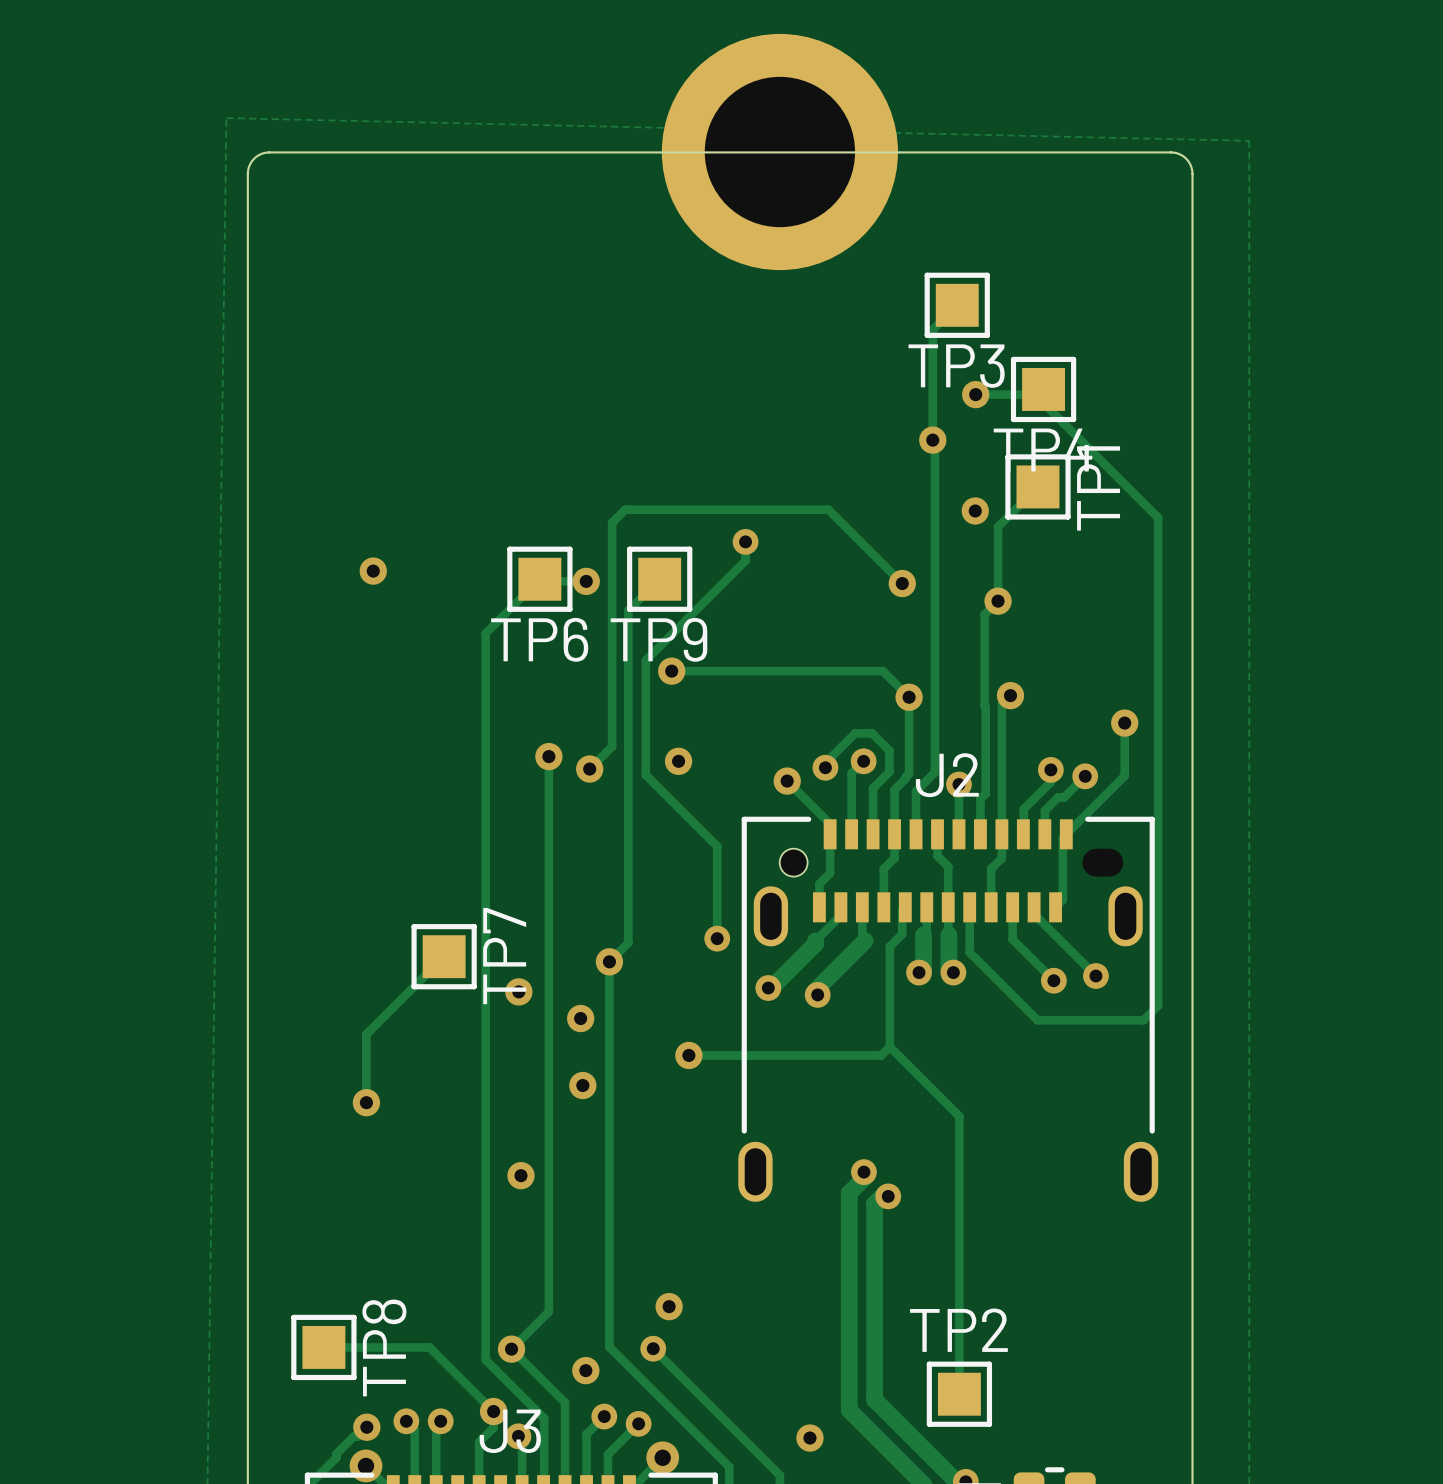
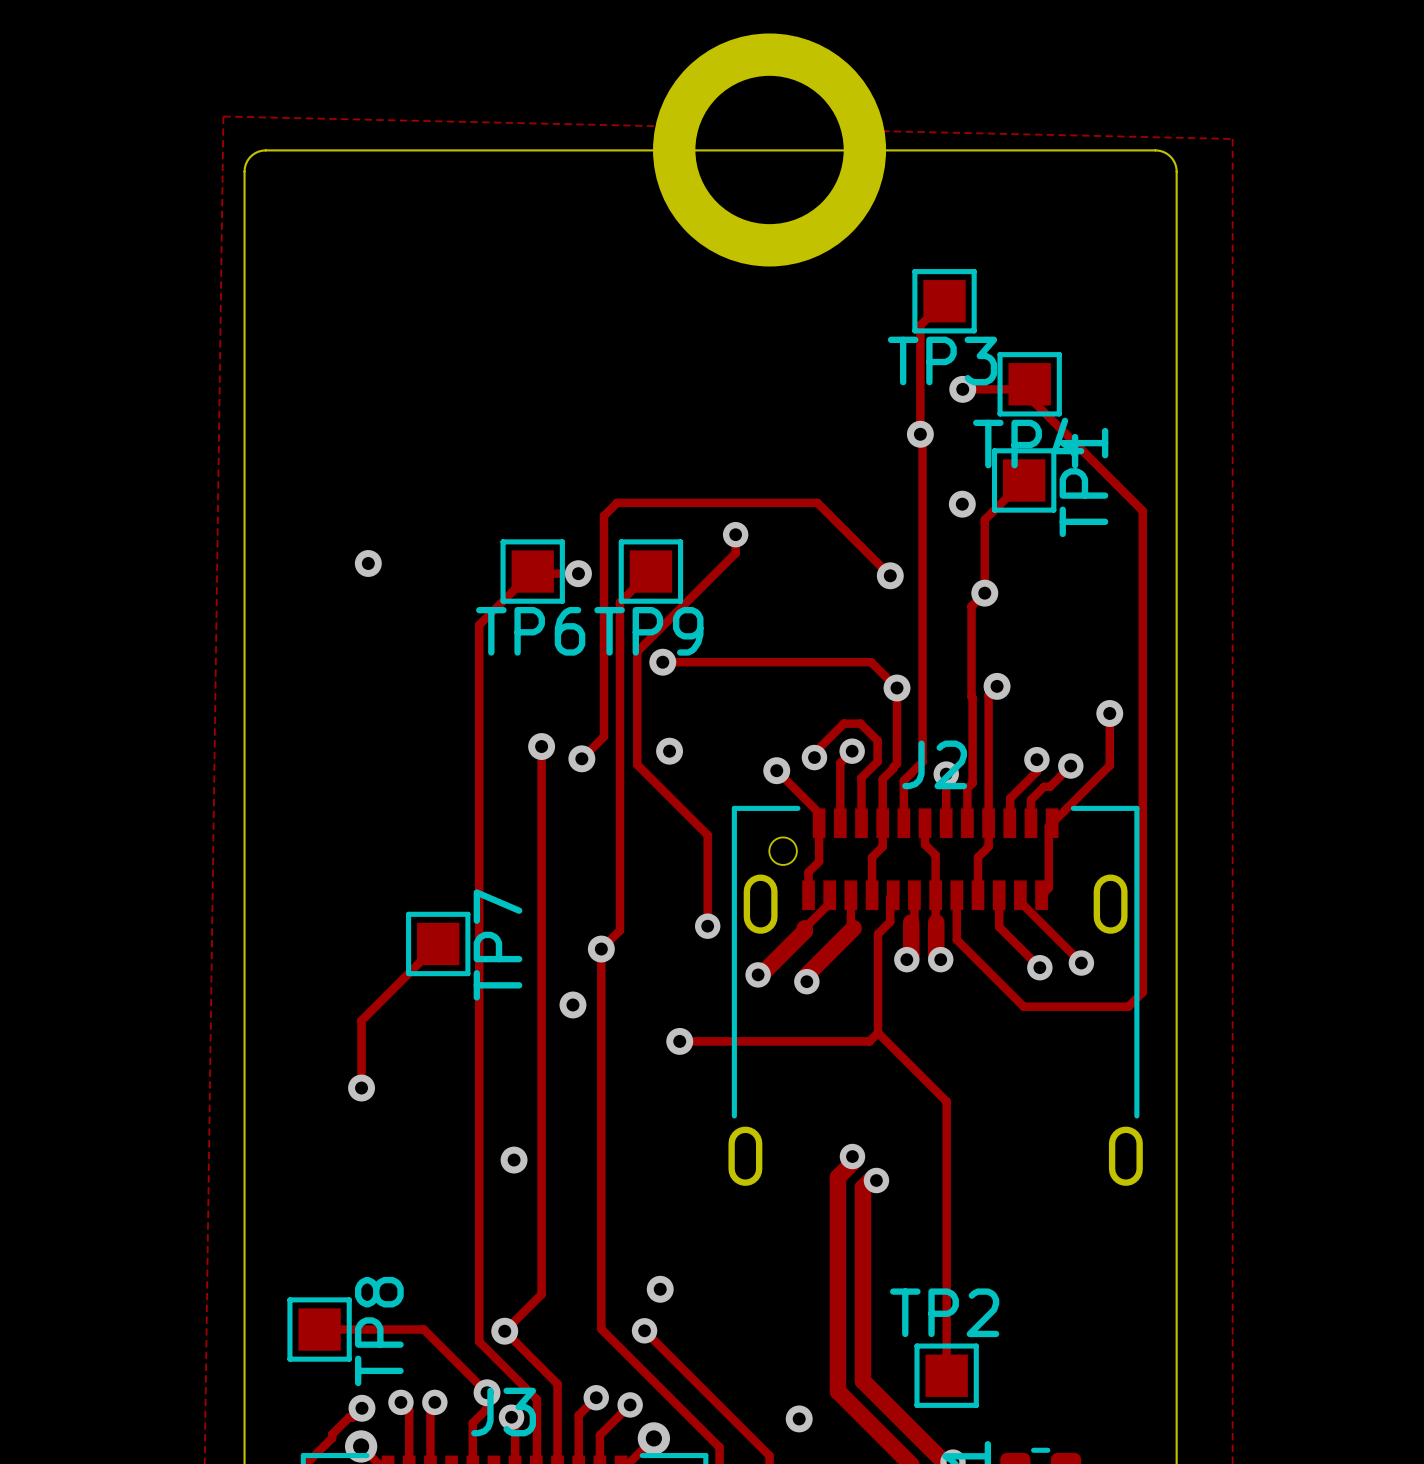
via: (518, 991) -> none
via: (582, 1085) -> none
via: (585, 1370) -> none

